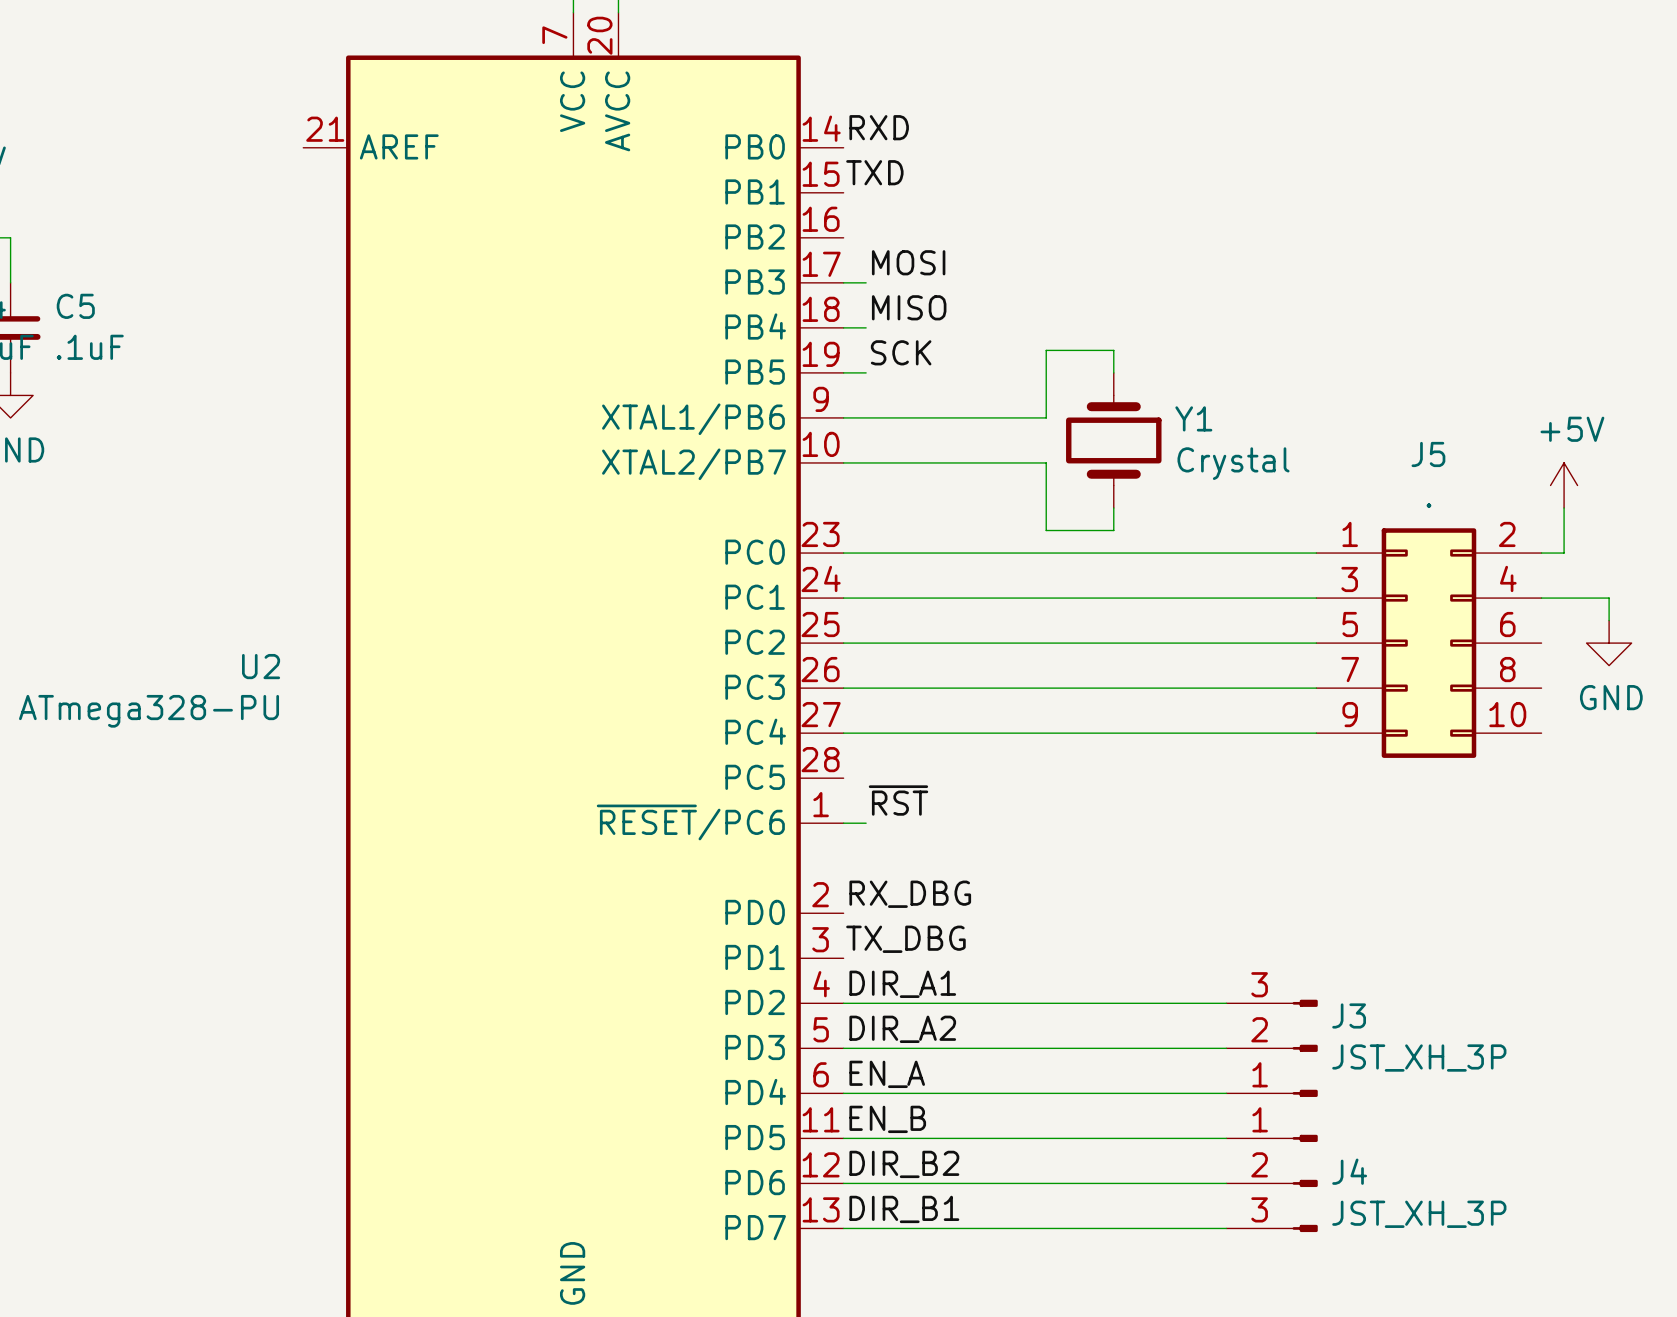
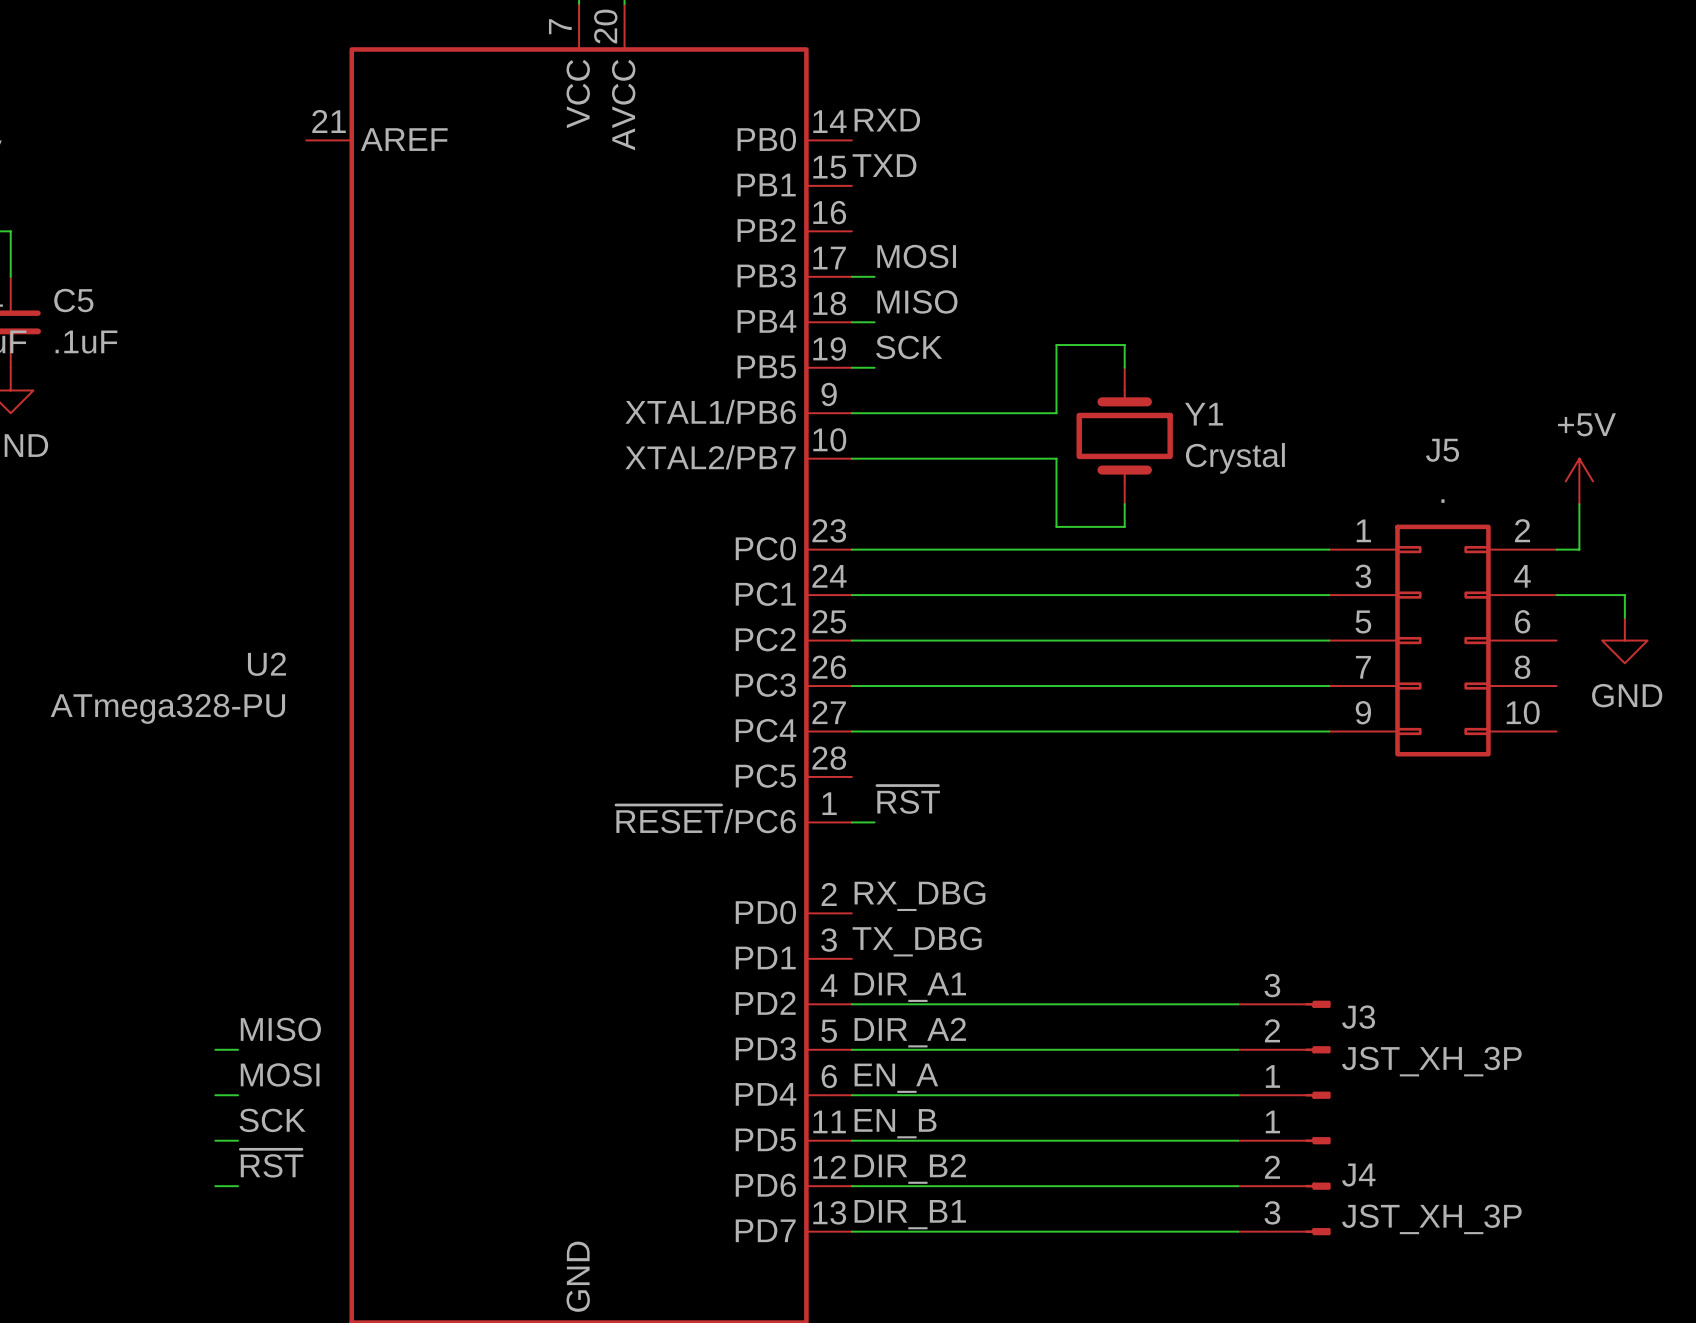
label: none -> MISO (280, 1029)
wire: none -> (215, 1049) (238, 1049)
label: none -> MOSI (280, 1074)
wire: none -> (215, 1095) (238, 1095)
label: none -> SCK (272, 1120)
wire: none -> (215, 1140) (238, 1140)
label: none -> ~{RST} (271, 1163)
wire: none -> (215, 1186) (238, 1186)

